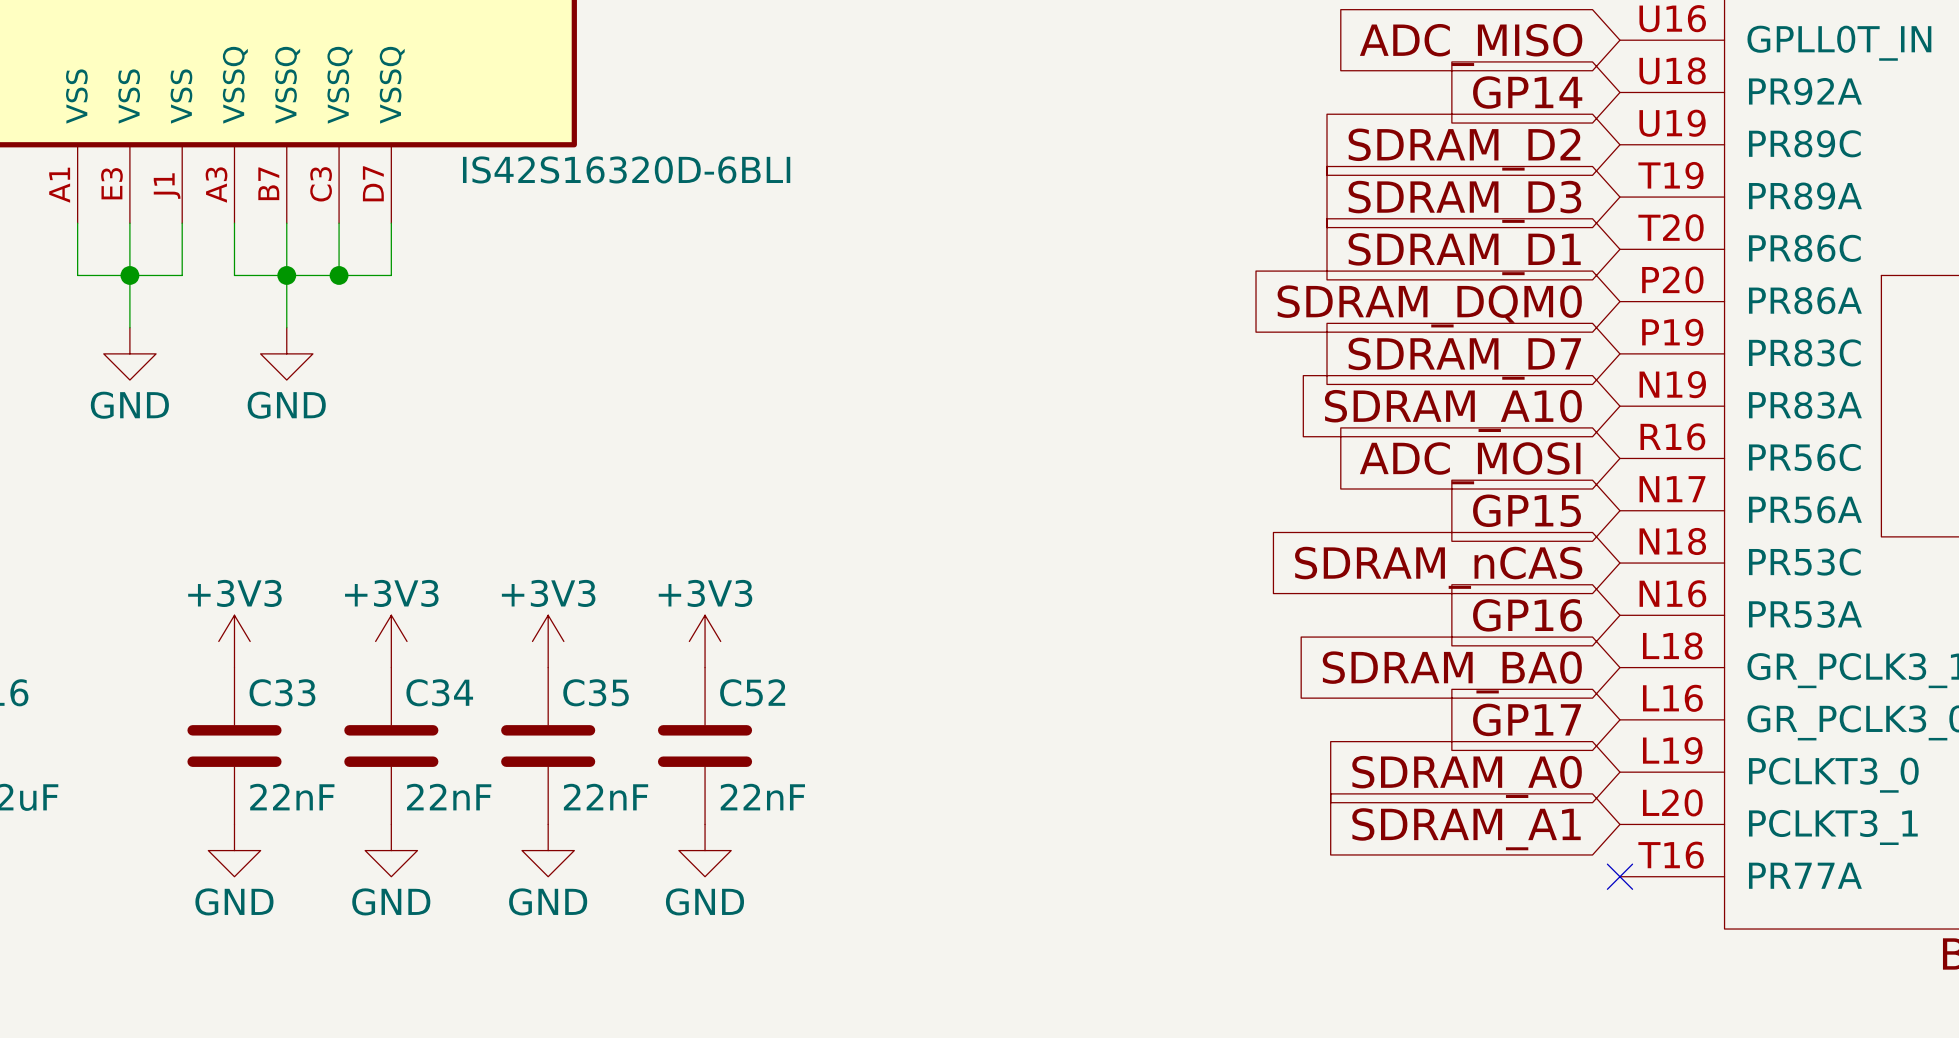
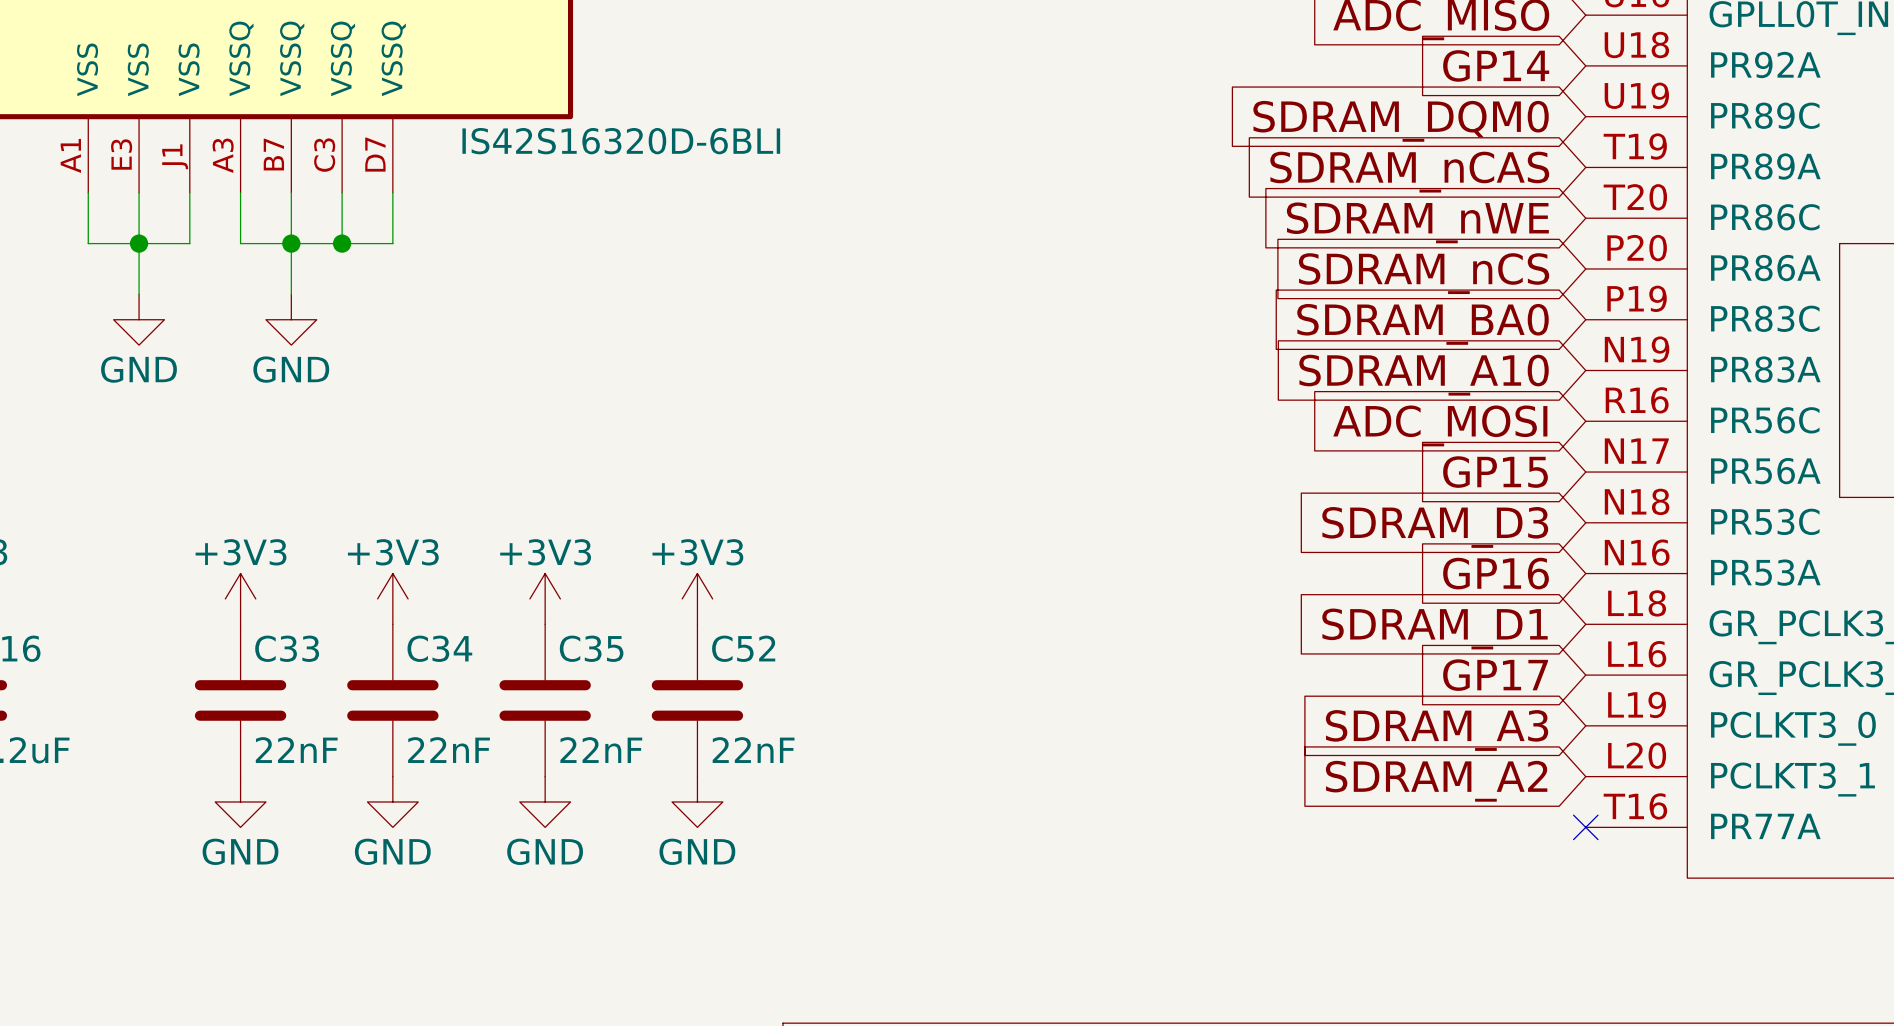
global label: SDRAM_D2 (1464, 149) -> SDRAM_DQM0 (1401, 121)
global label: SDRAM_D3 (1464, 201) -> SDRAM_nCAS (1409, 172)
global label: SDRAM_D1 (1464, 254) -> SDRAM_nWE (1417, 222)
global label: SDRAM_DQM0 (1429, 306) -> SDRAM_nCS (1424, 273)
global label: SDRAM_D7 (1464, 358) -> SDRAM_BA0 (1423, 324)
global label: SDRAM_nCAS (1438, 567) -> SDRAM_D3 (1435, 527)
global label: SDRAM_BA0 (1452, 672) -> SDRAM_D1 (1434, 628)
global label: SDRAM_A0 (1467, 776) -> SDRAM_A3 (1437, 730)
global label: SDRAM_A1 (1466, 829) -> SDRAM_A2 (1436, 781)

